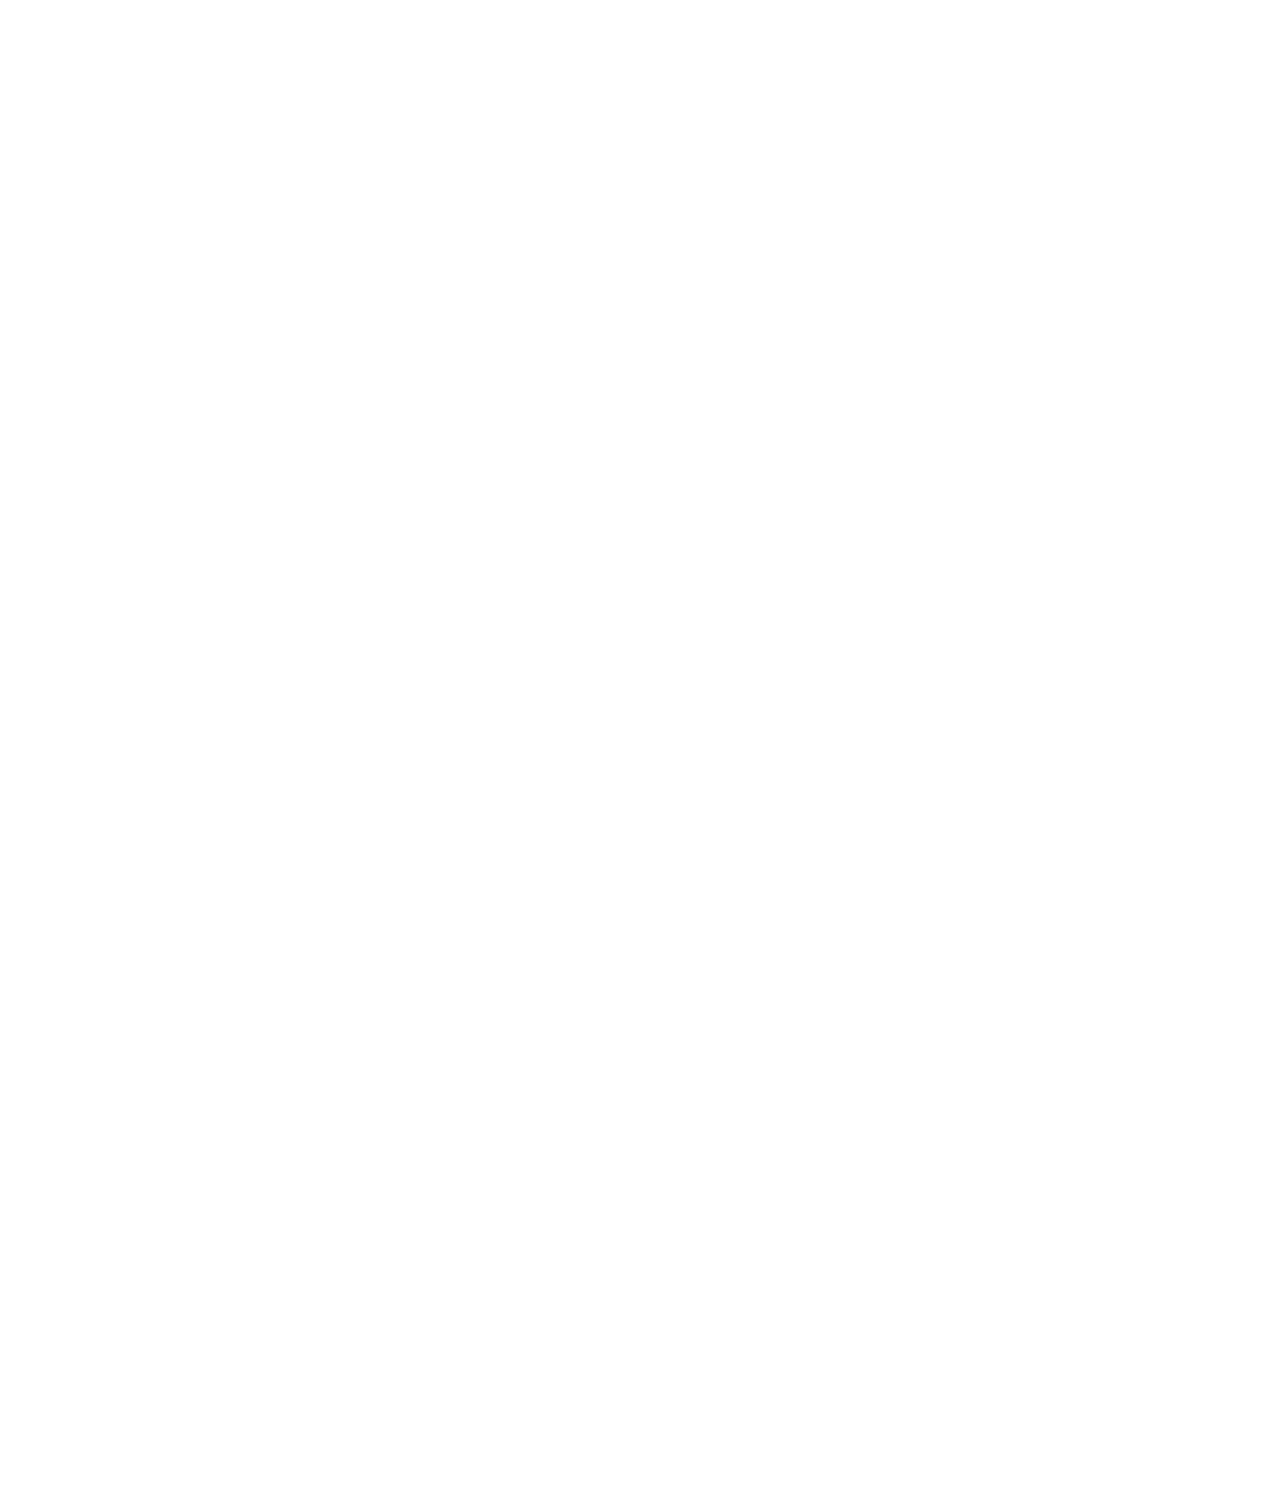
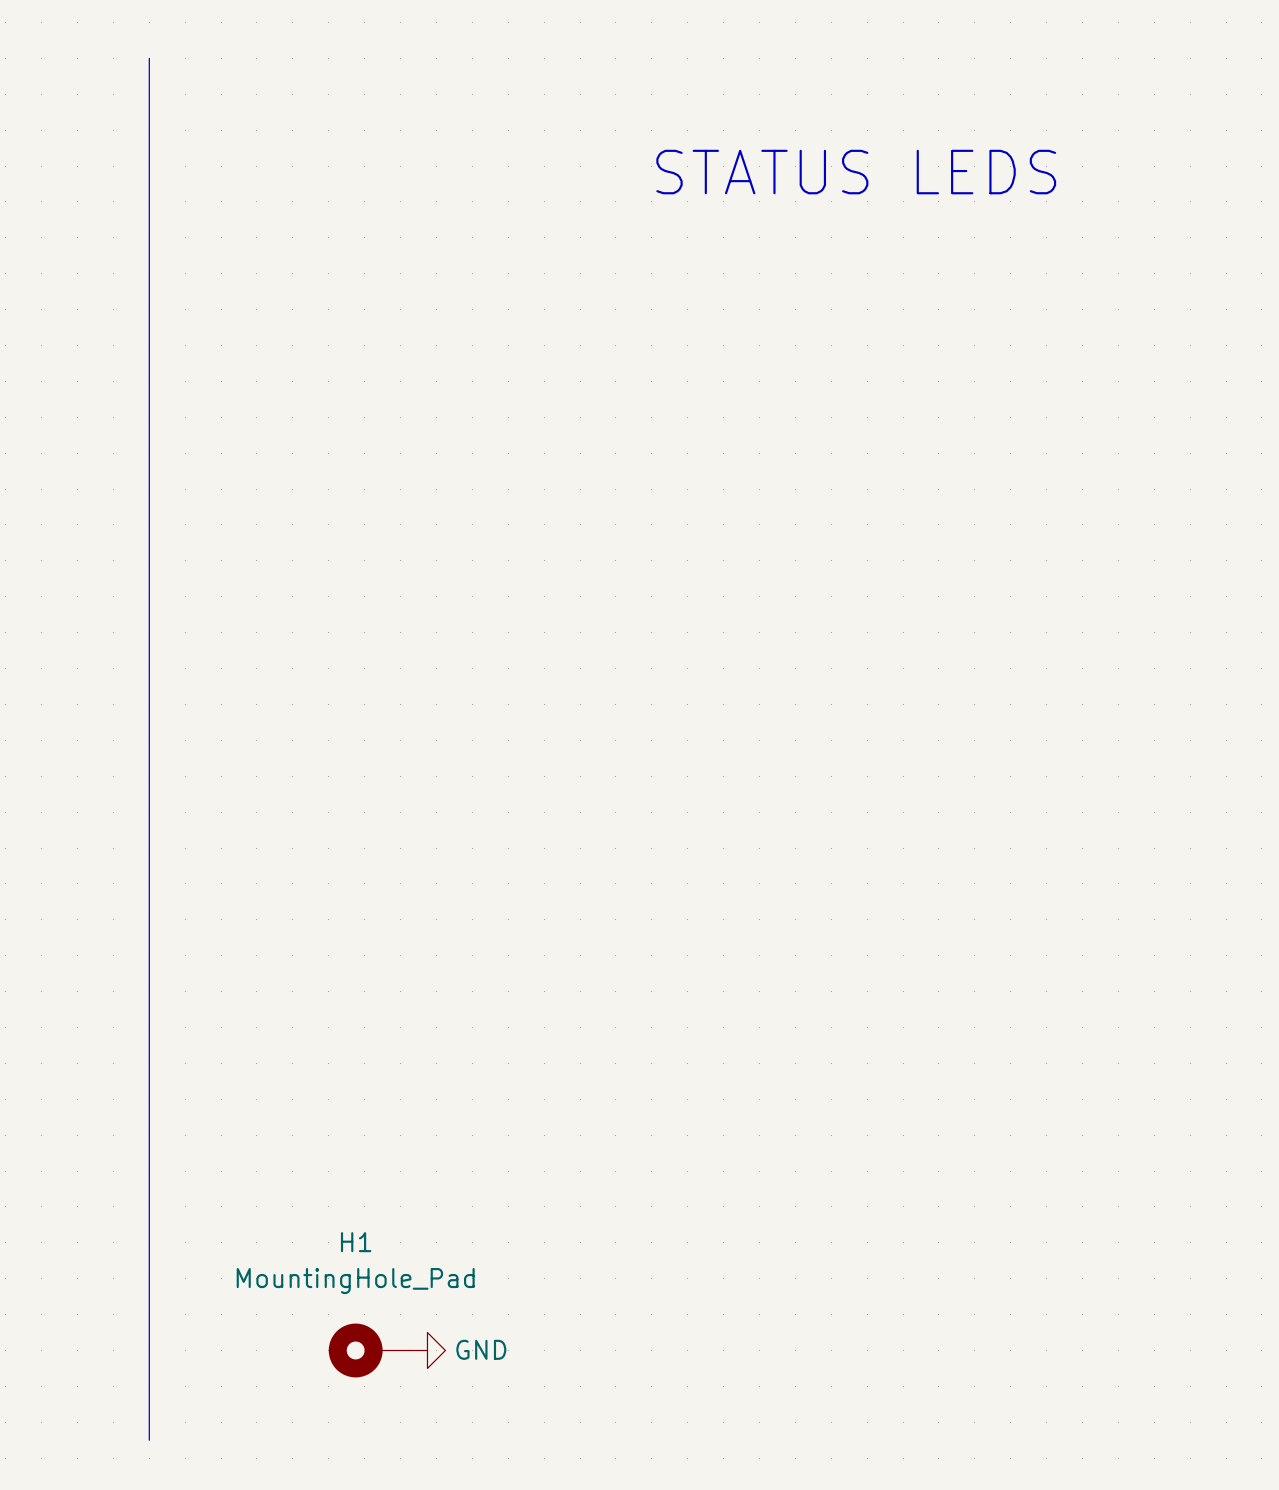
line: none -> (149, 58) (149, 1440)
text: none -> STATUS LEDS (856, 172)
H1: none -> MountingHole_Pad (369, 1350)
power symbol: none -> GND (427, 1350)

